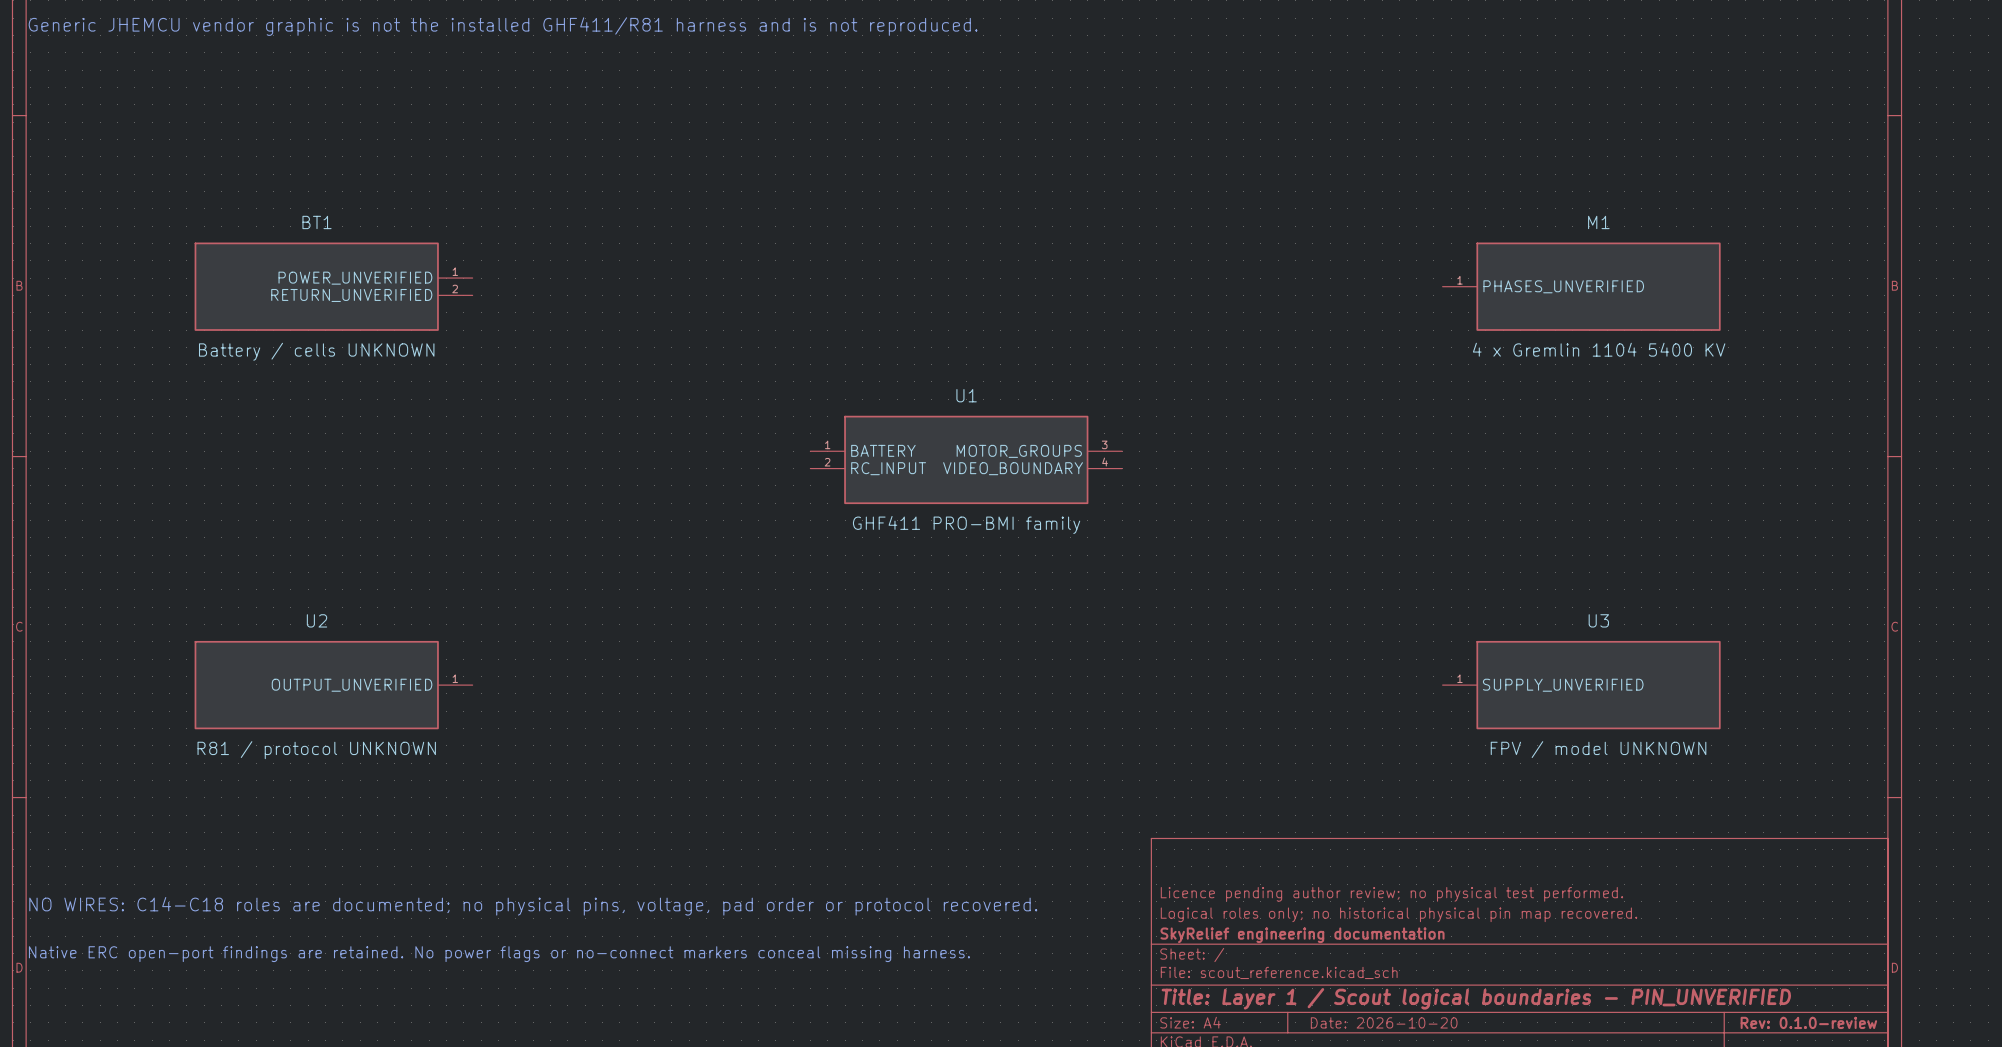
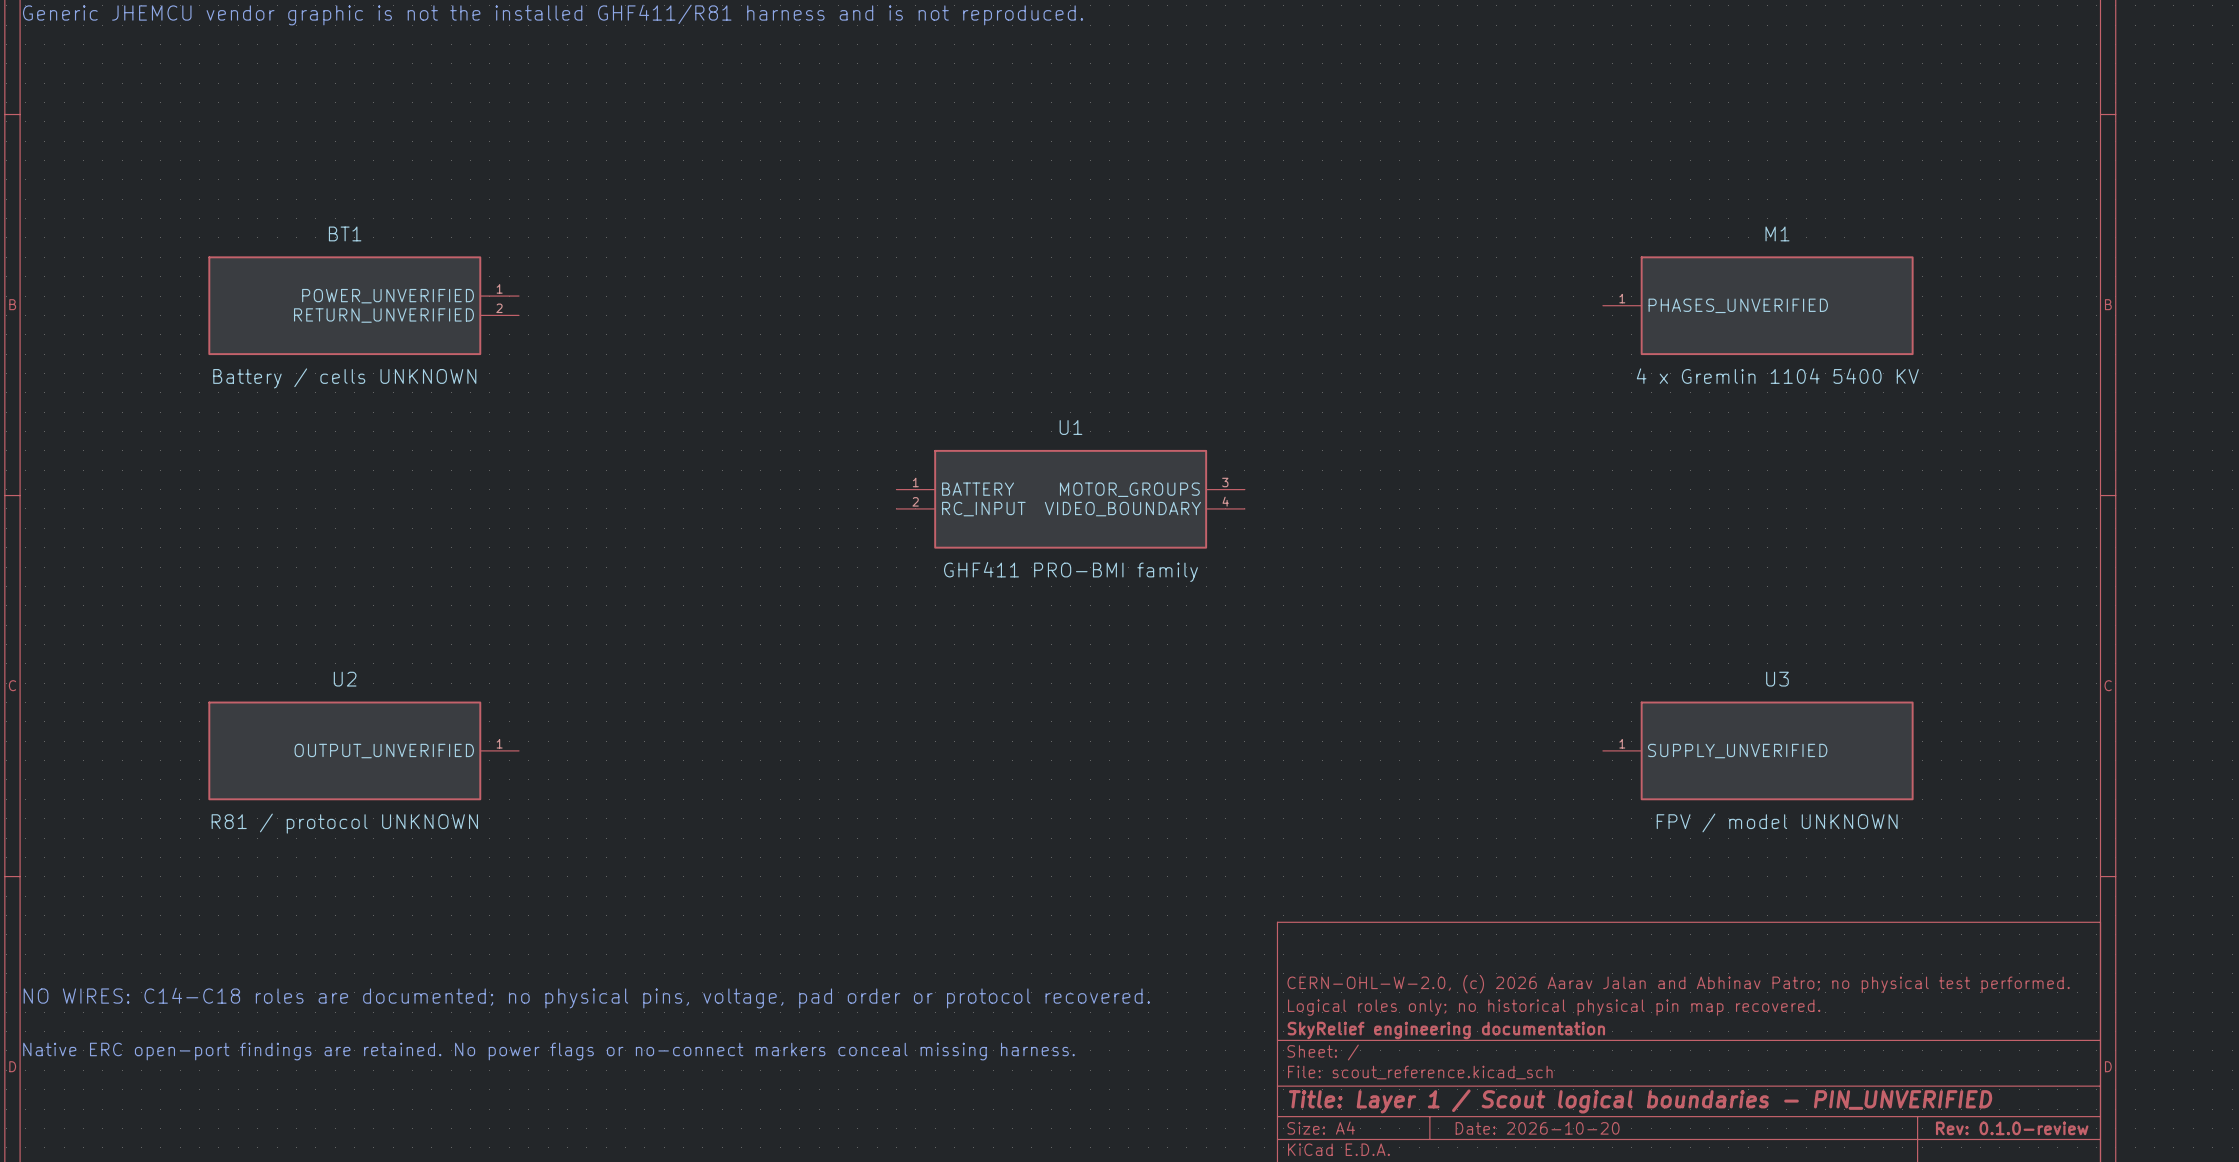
title block: Licence pending author review; no physical test performed. (1391, 894) -> CERN-OHL-W-2.0, (c) 2026 Aarav Jalan and Abhinav Patro; no physical test performed. (1678, 984)

